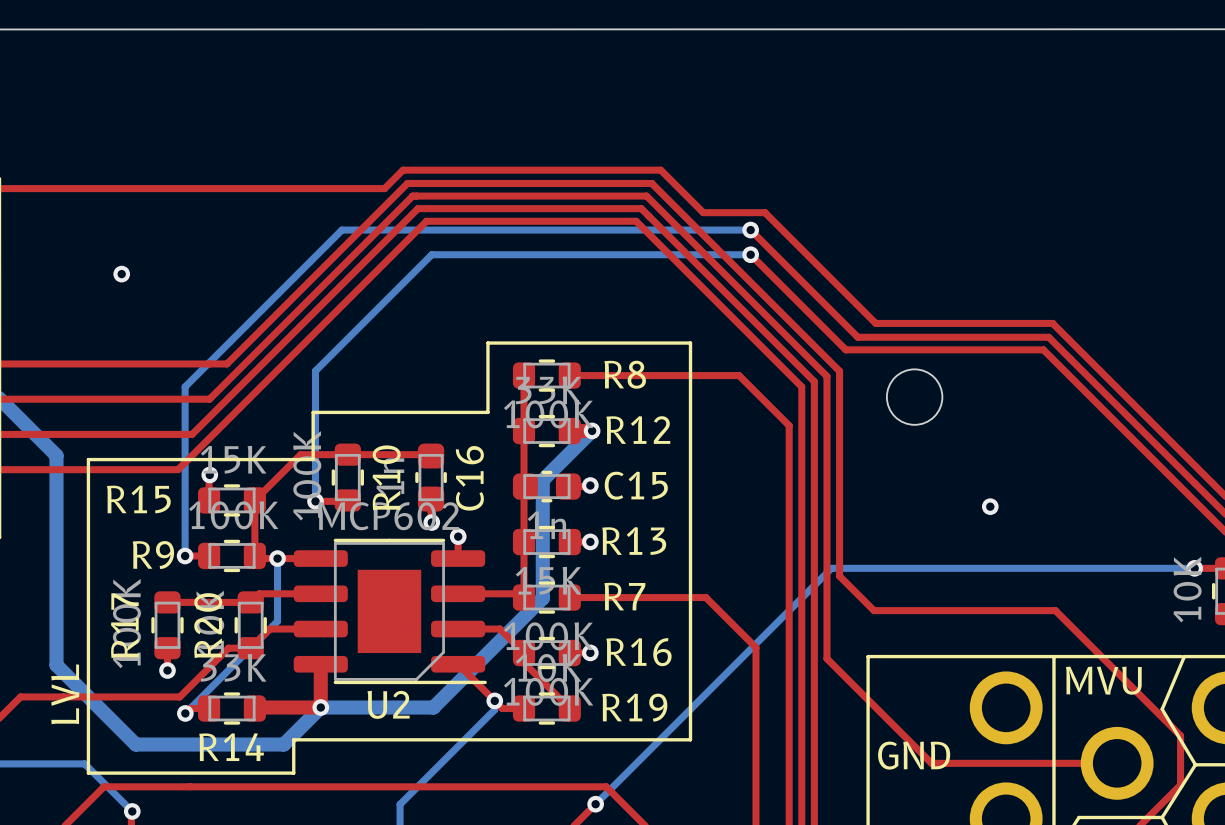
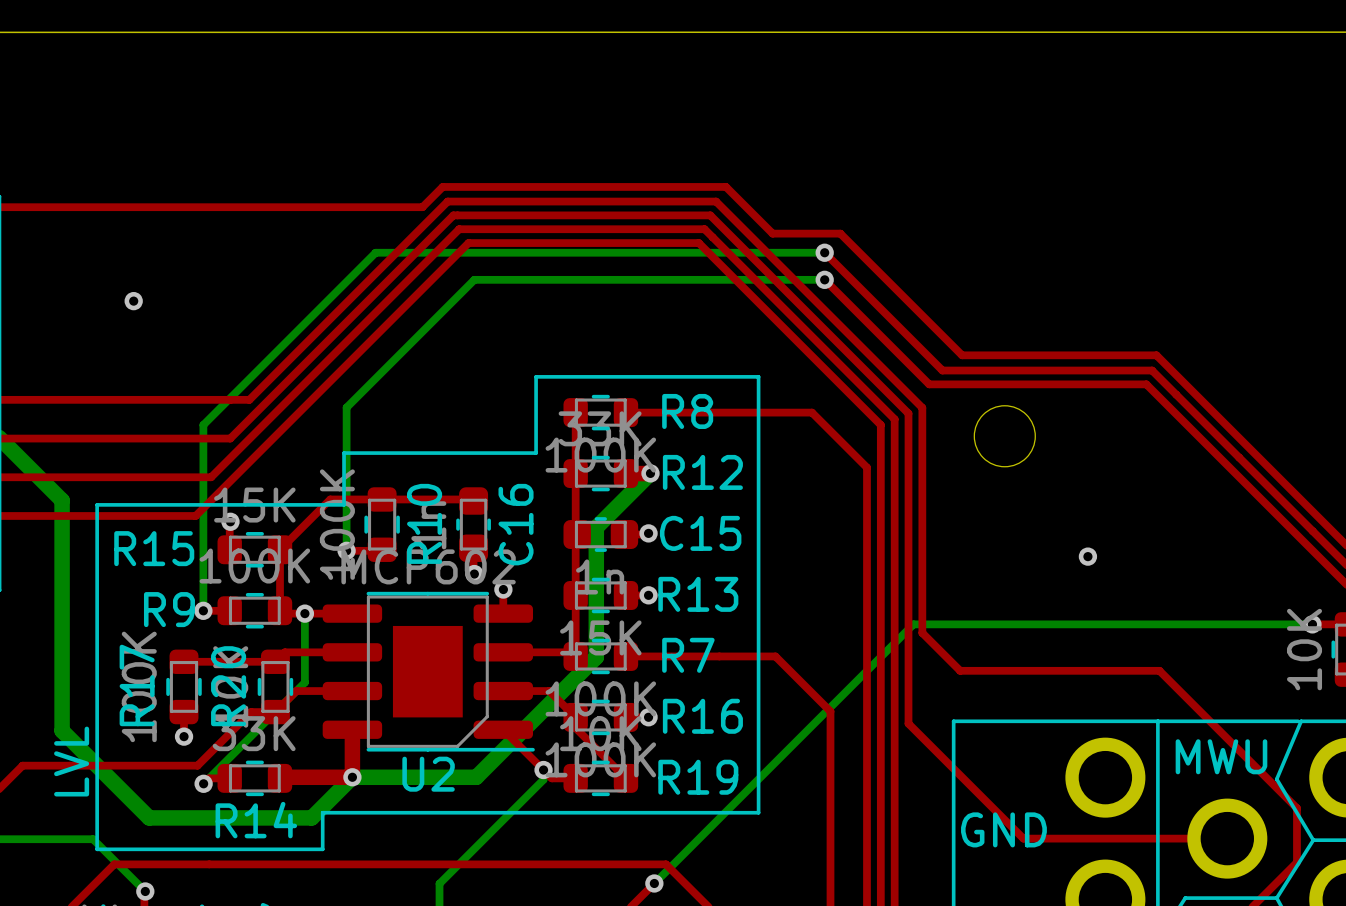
text: MVU (1103, 680) -> MWU (1221, 756)

